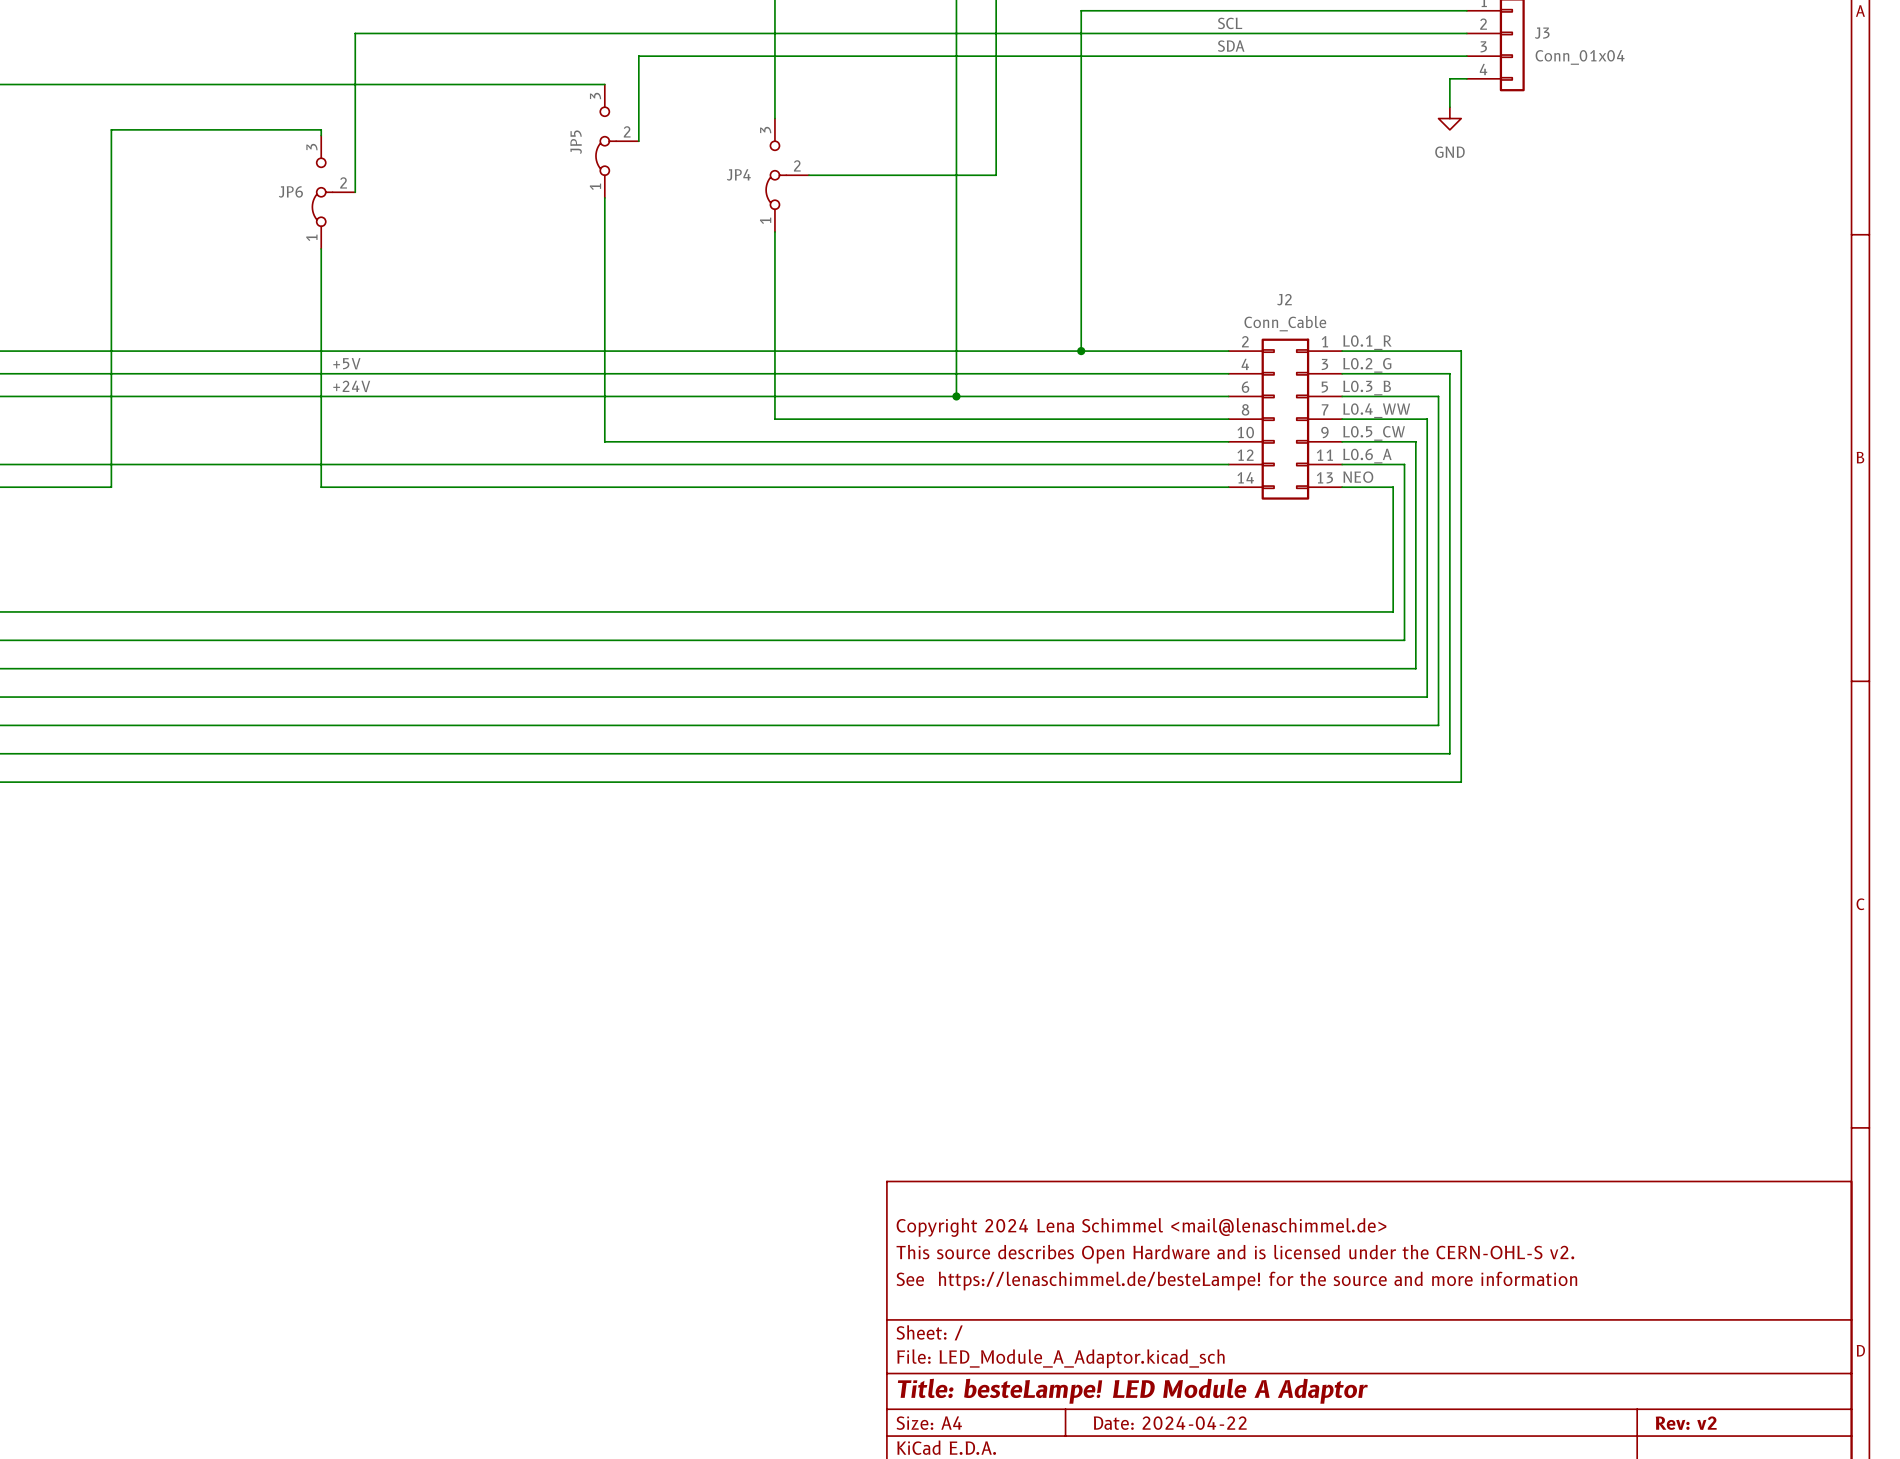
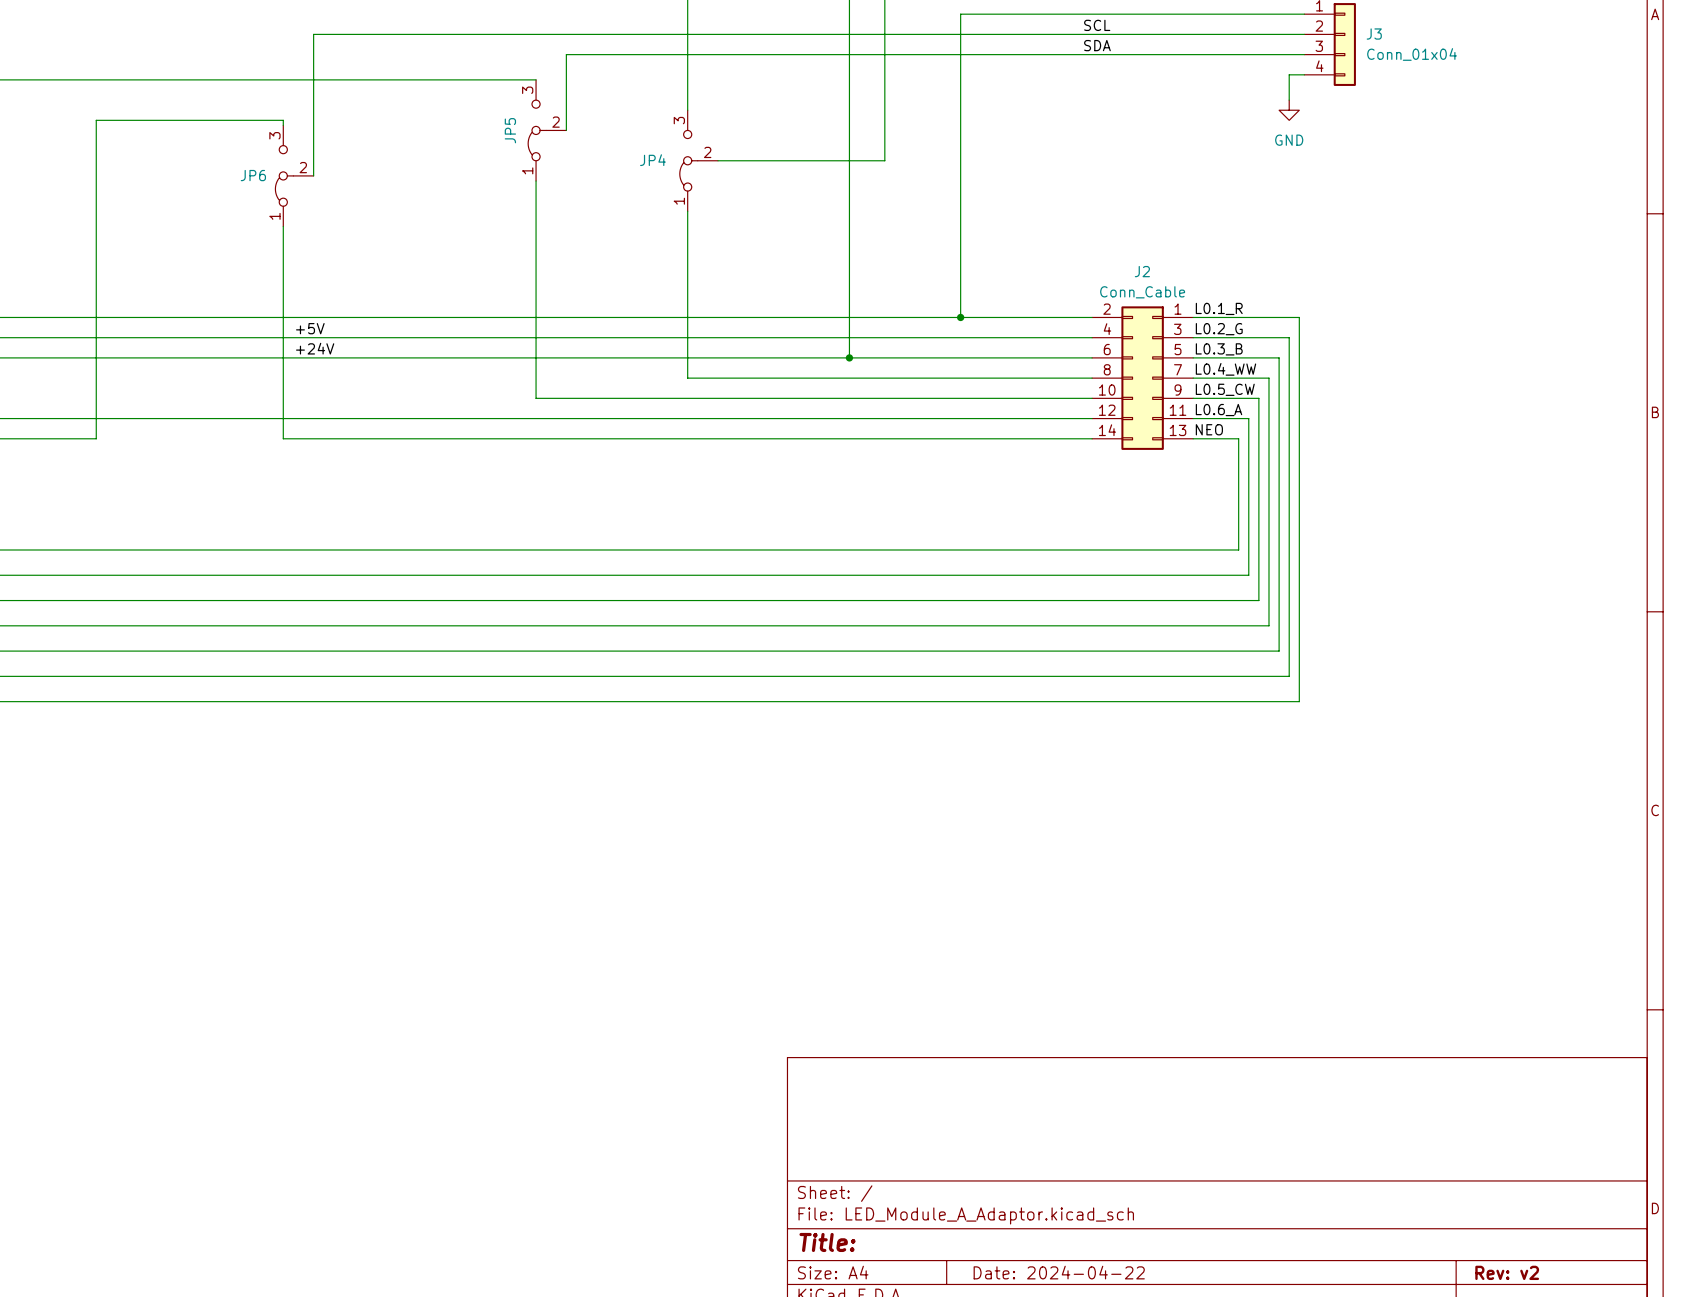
title block: Copyright 2024 Lena Schimmel <mail@lenaschimmel.de> (1141, 1227) -> none
title block: This source describes Open Hardware and is licensed under the CERN-OHL-S v2. (1235, 1254) -> none
title block: See https://lenaschimmel.de/besteLampe! for the source and more information (1236, 1281) -> none
title block: Title: besteLampe! LED Module A Adaptor (1132, 1391) -> Title: (827, 1242)

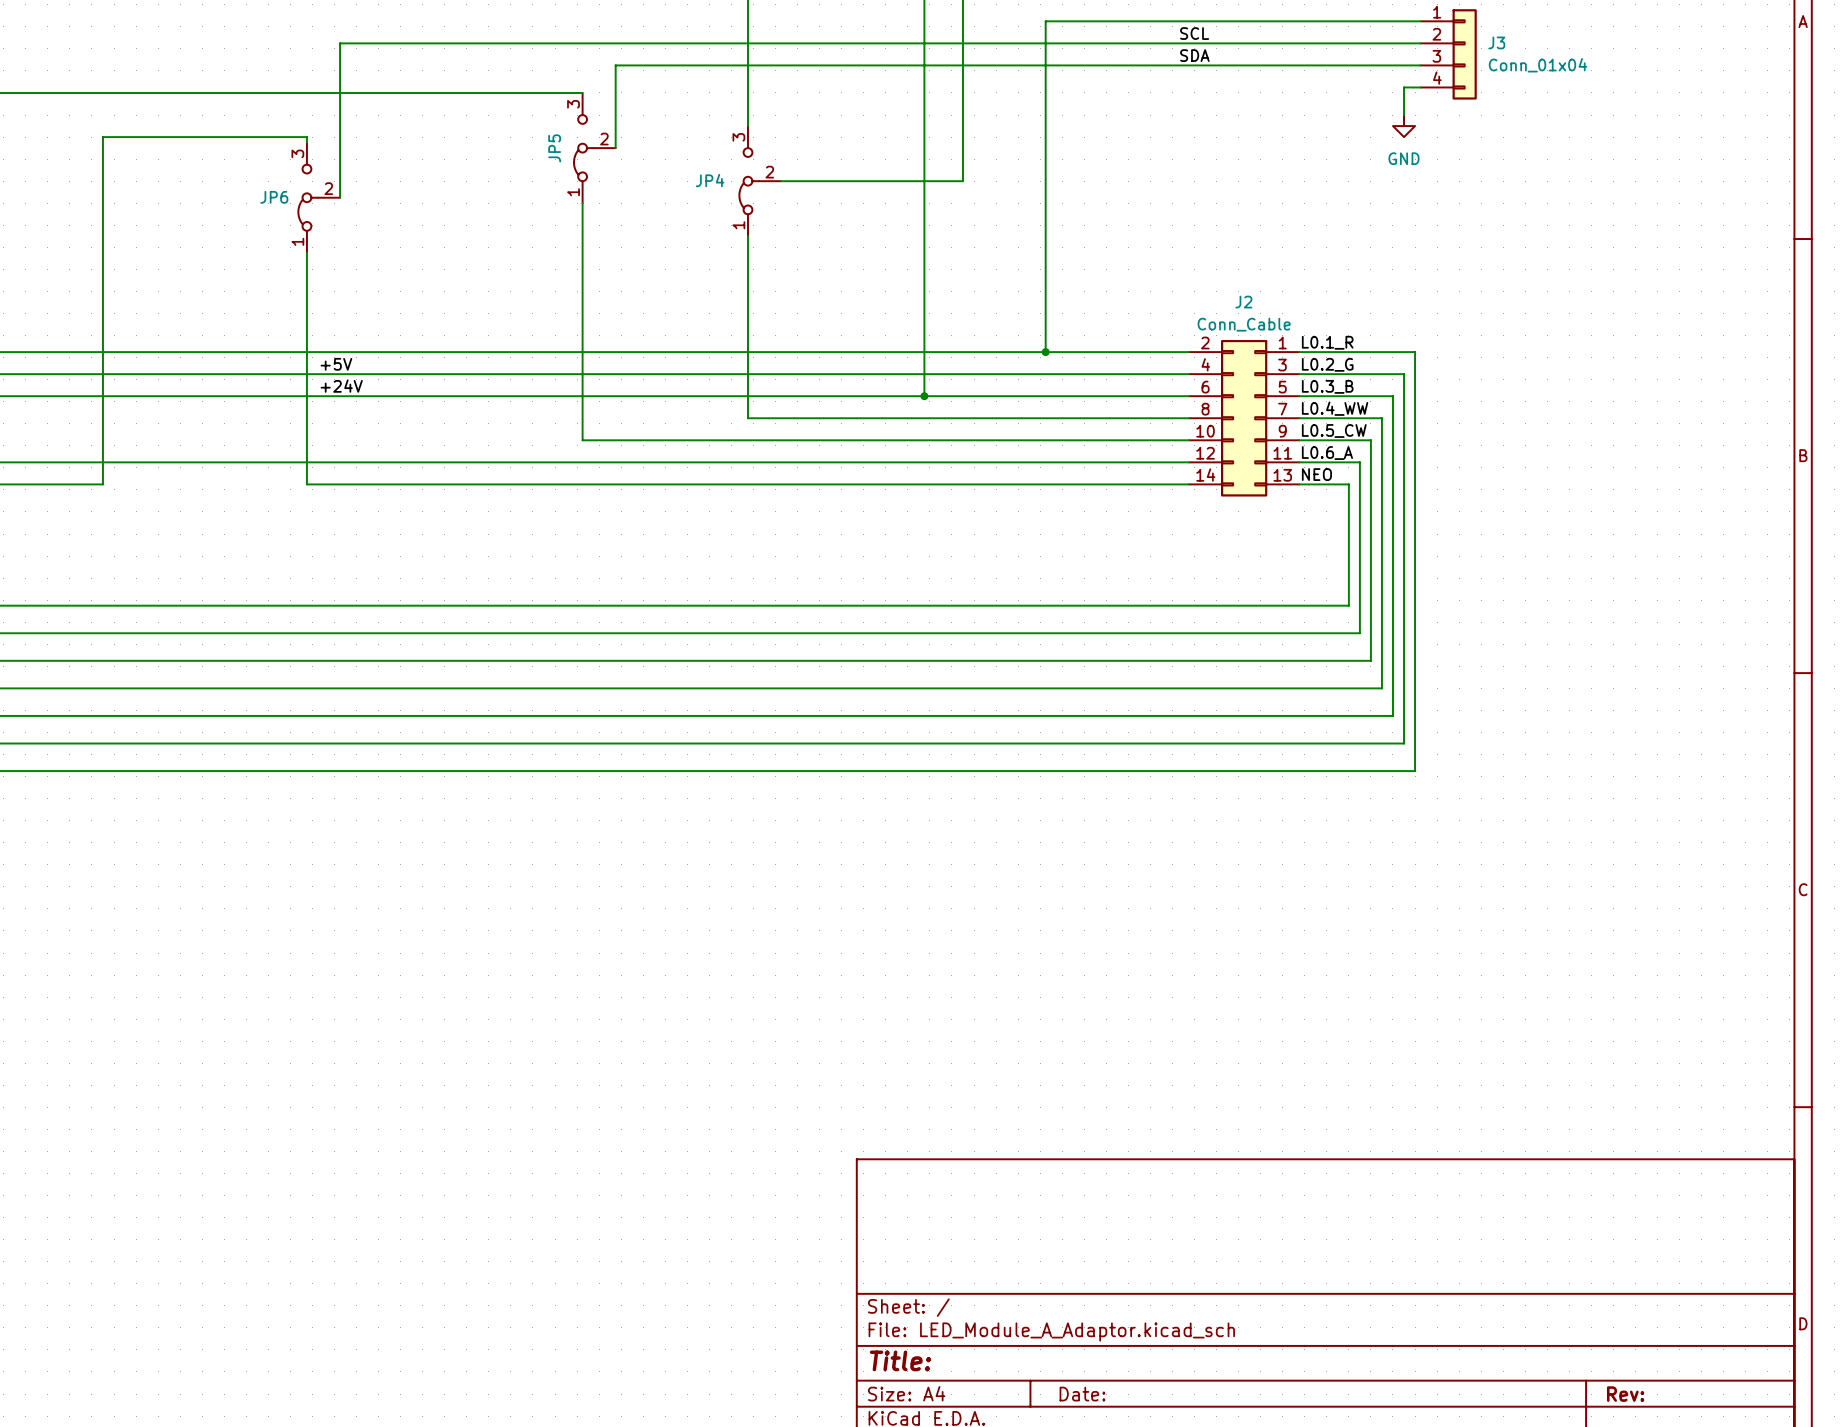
title block: Date: 2024-04-22 (1059, 1272) -> Date: (1082, 1394)
title block: Rev: v2 (1507, 1272) -> Rev: (1625, 1394)

